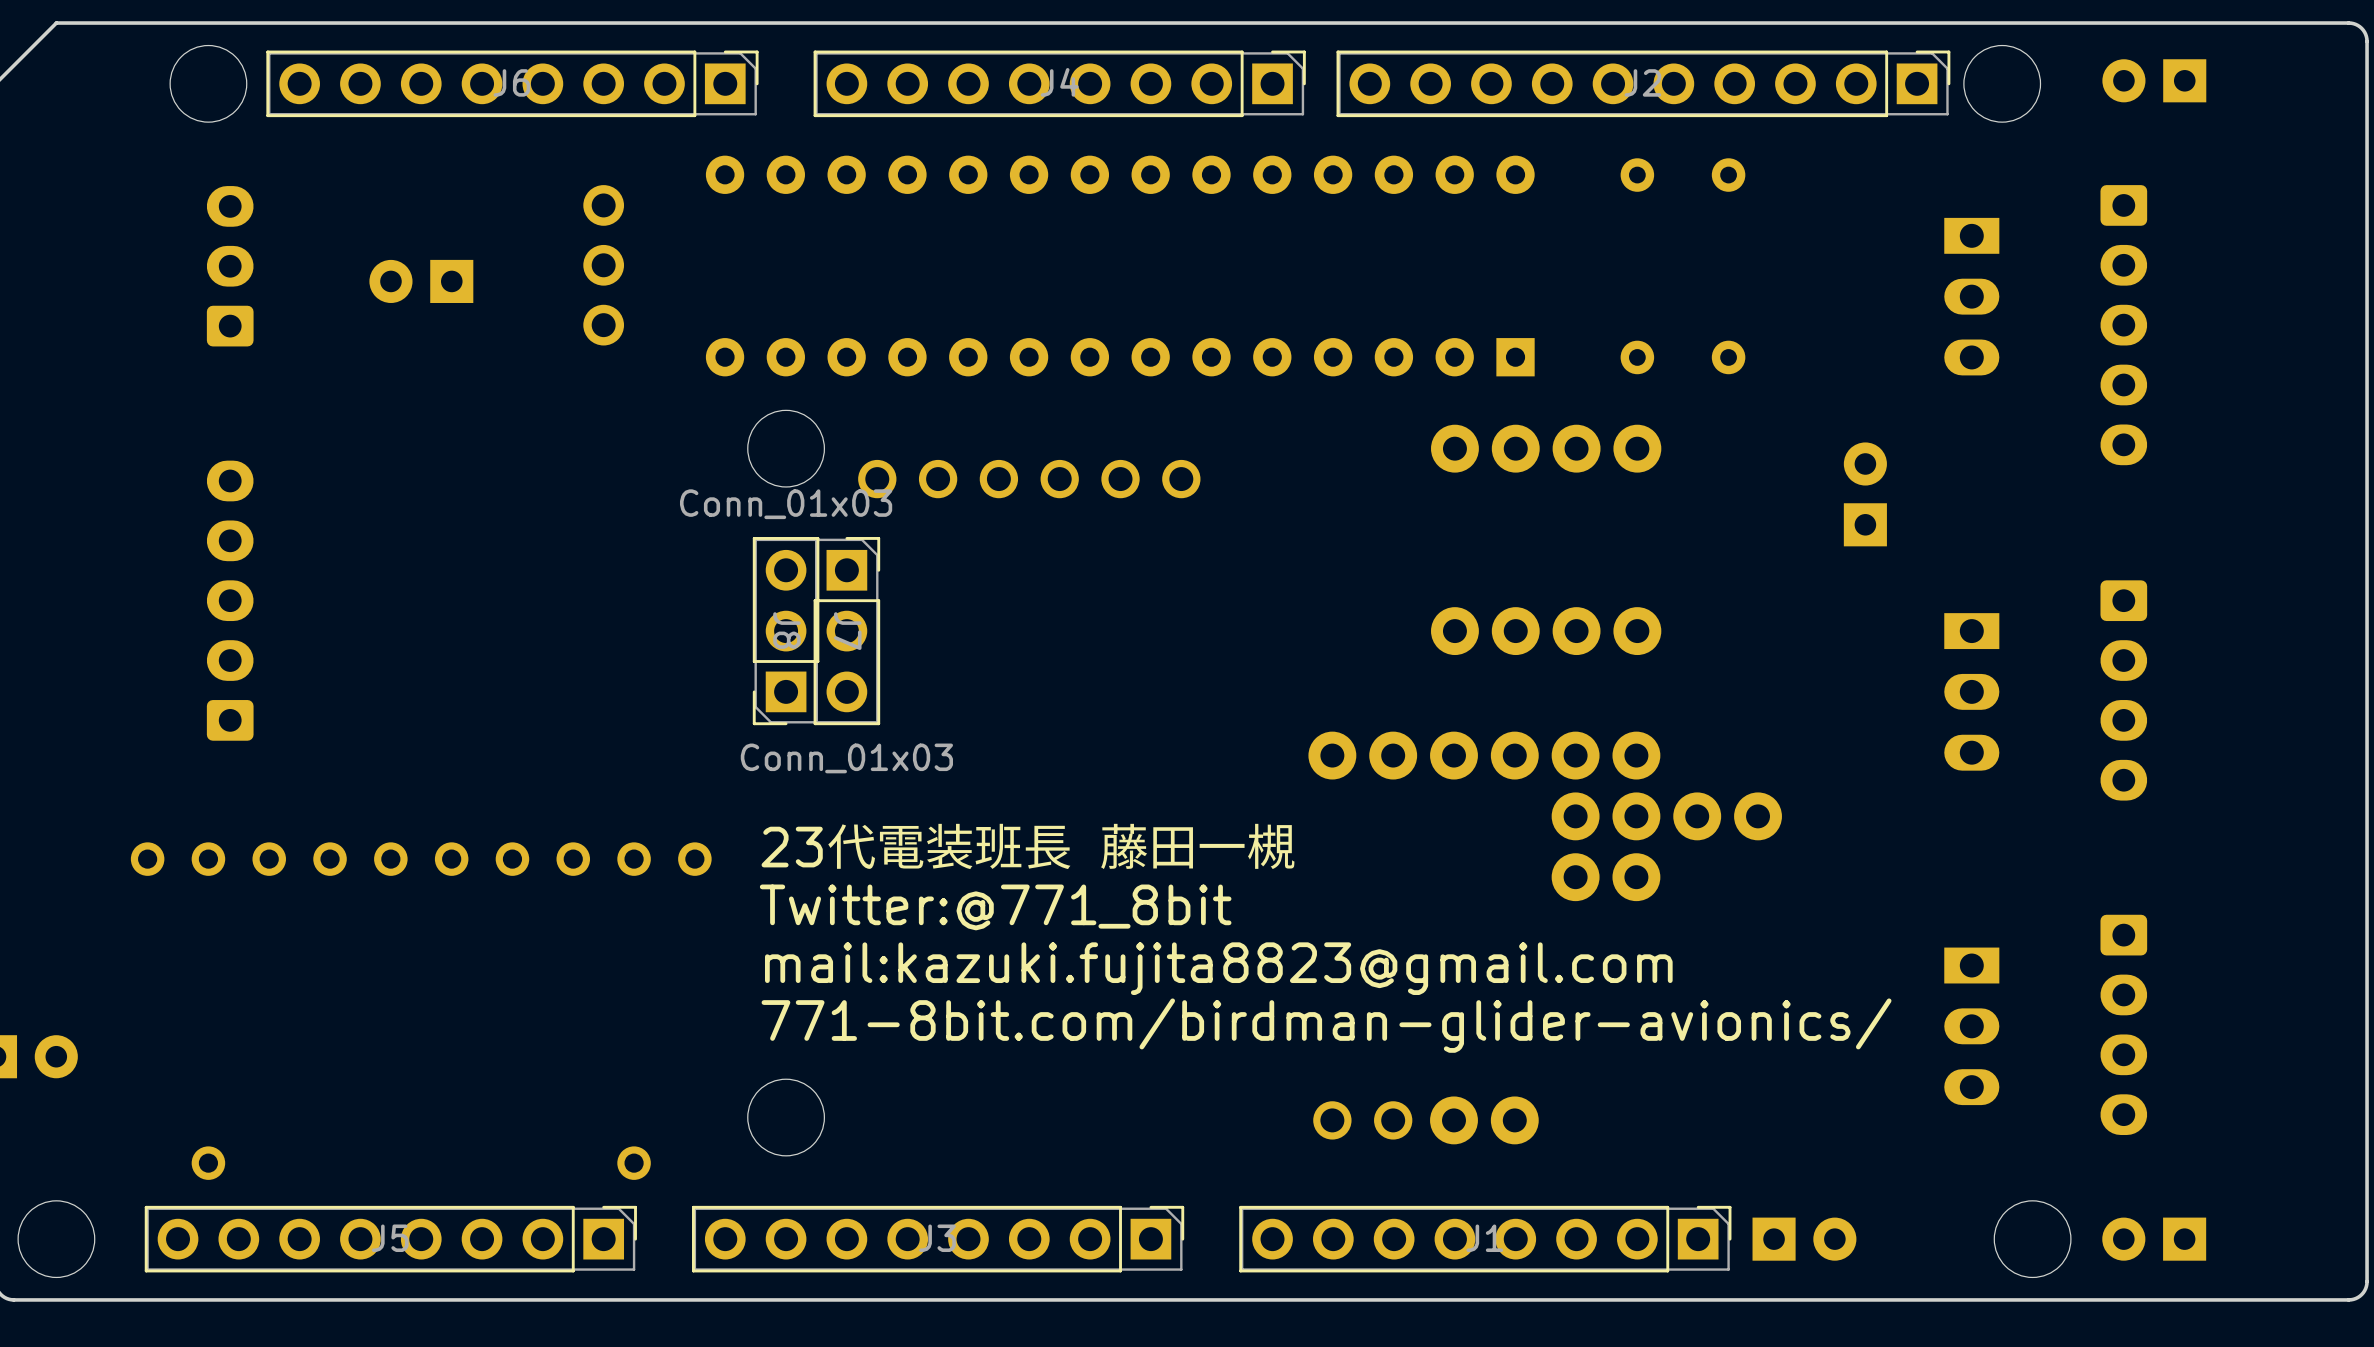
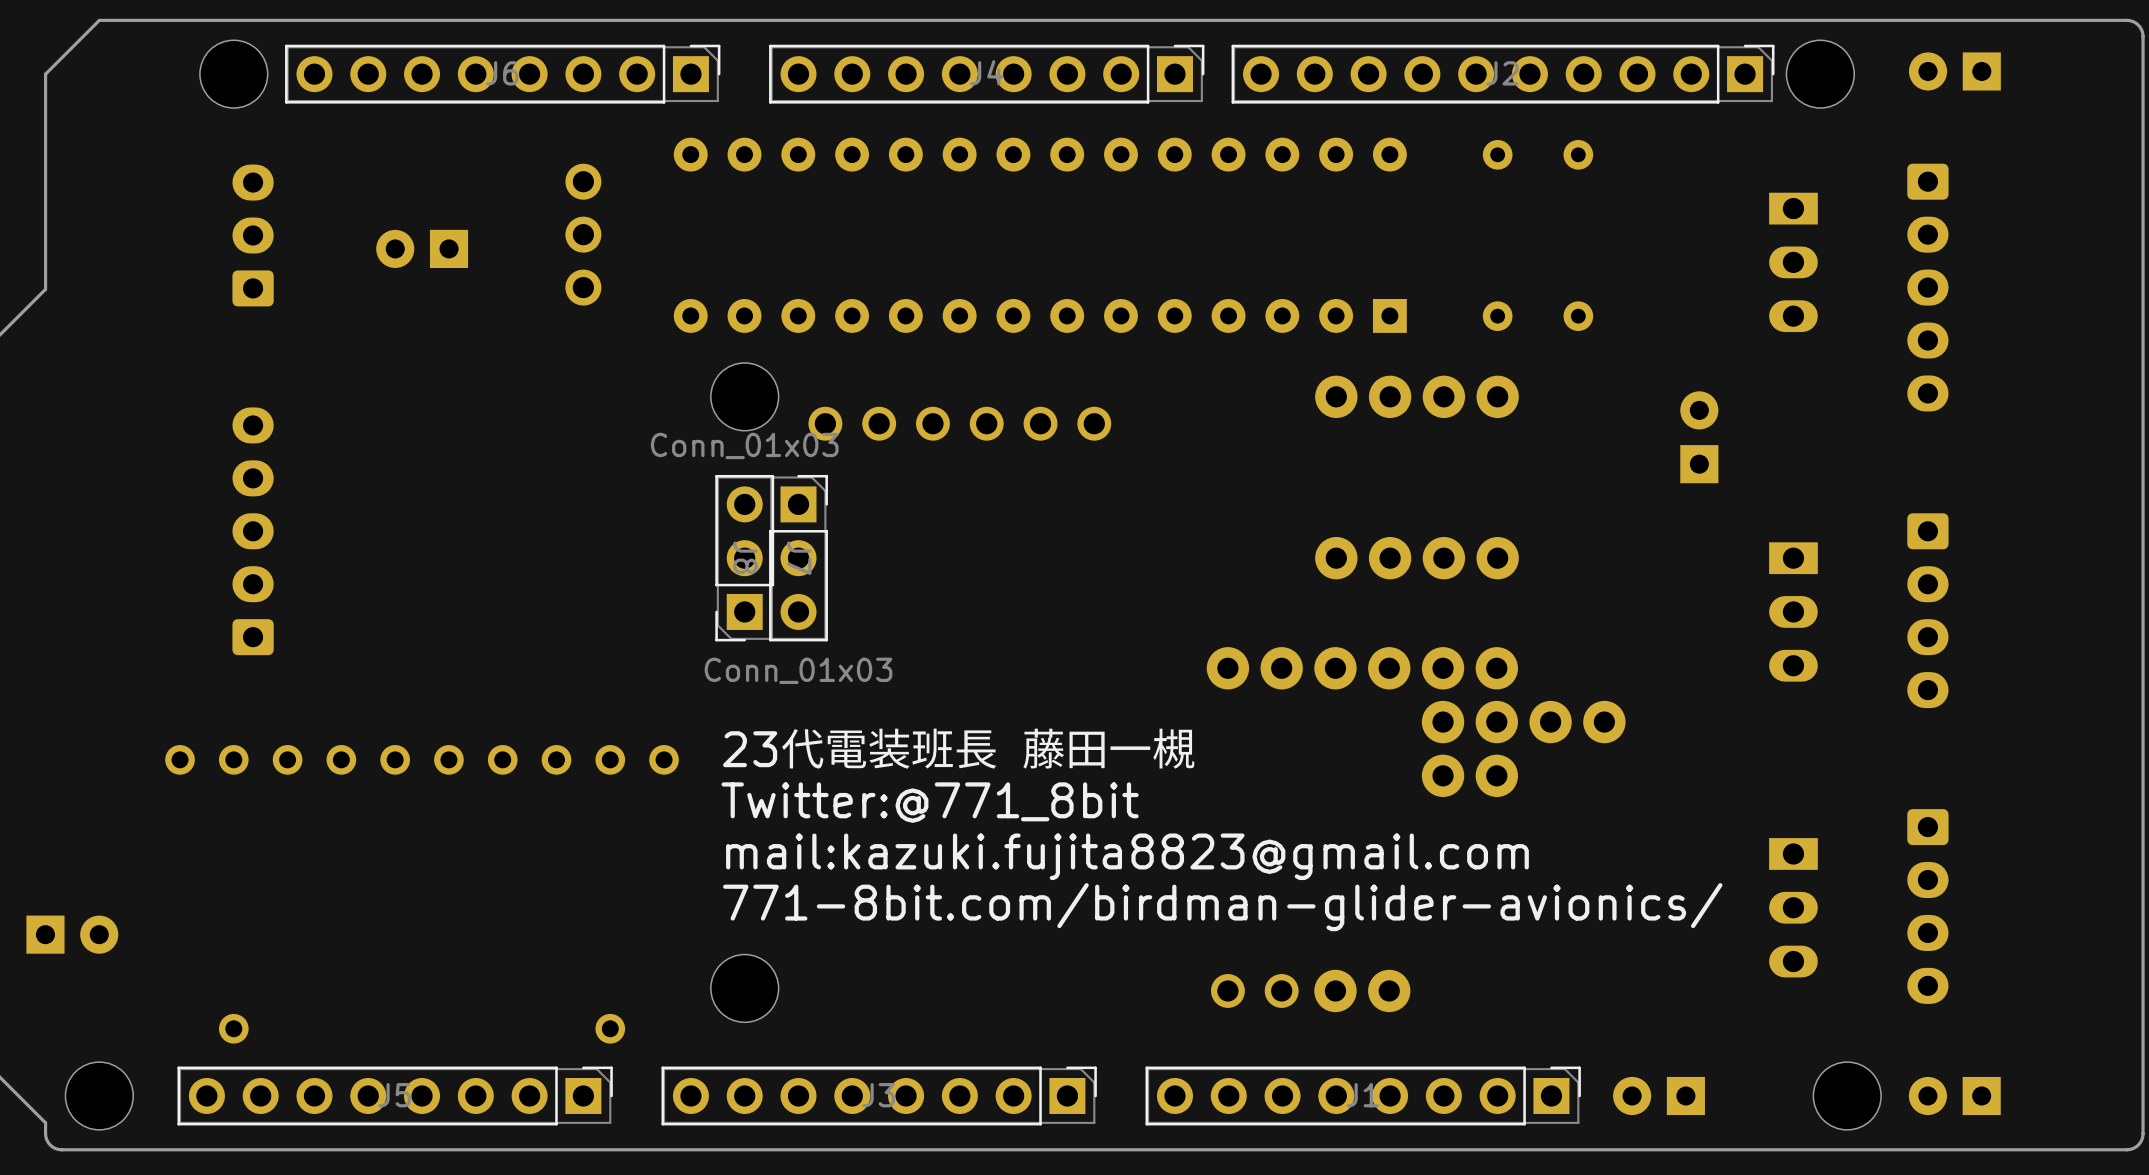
part rotation: 0° (1804, 1239) -> 180° (1659, 1095)

